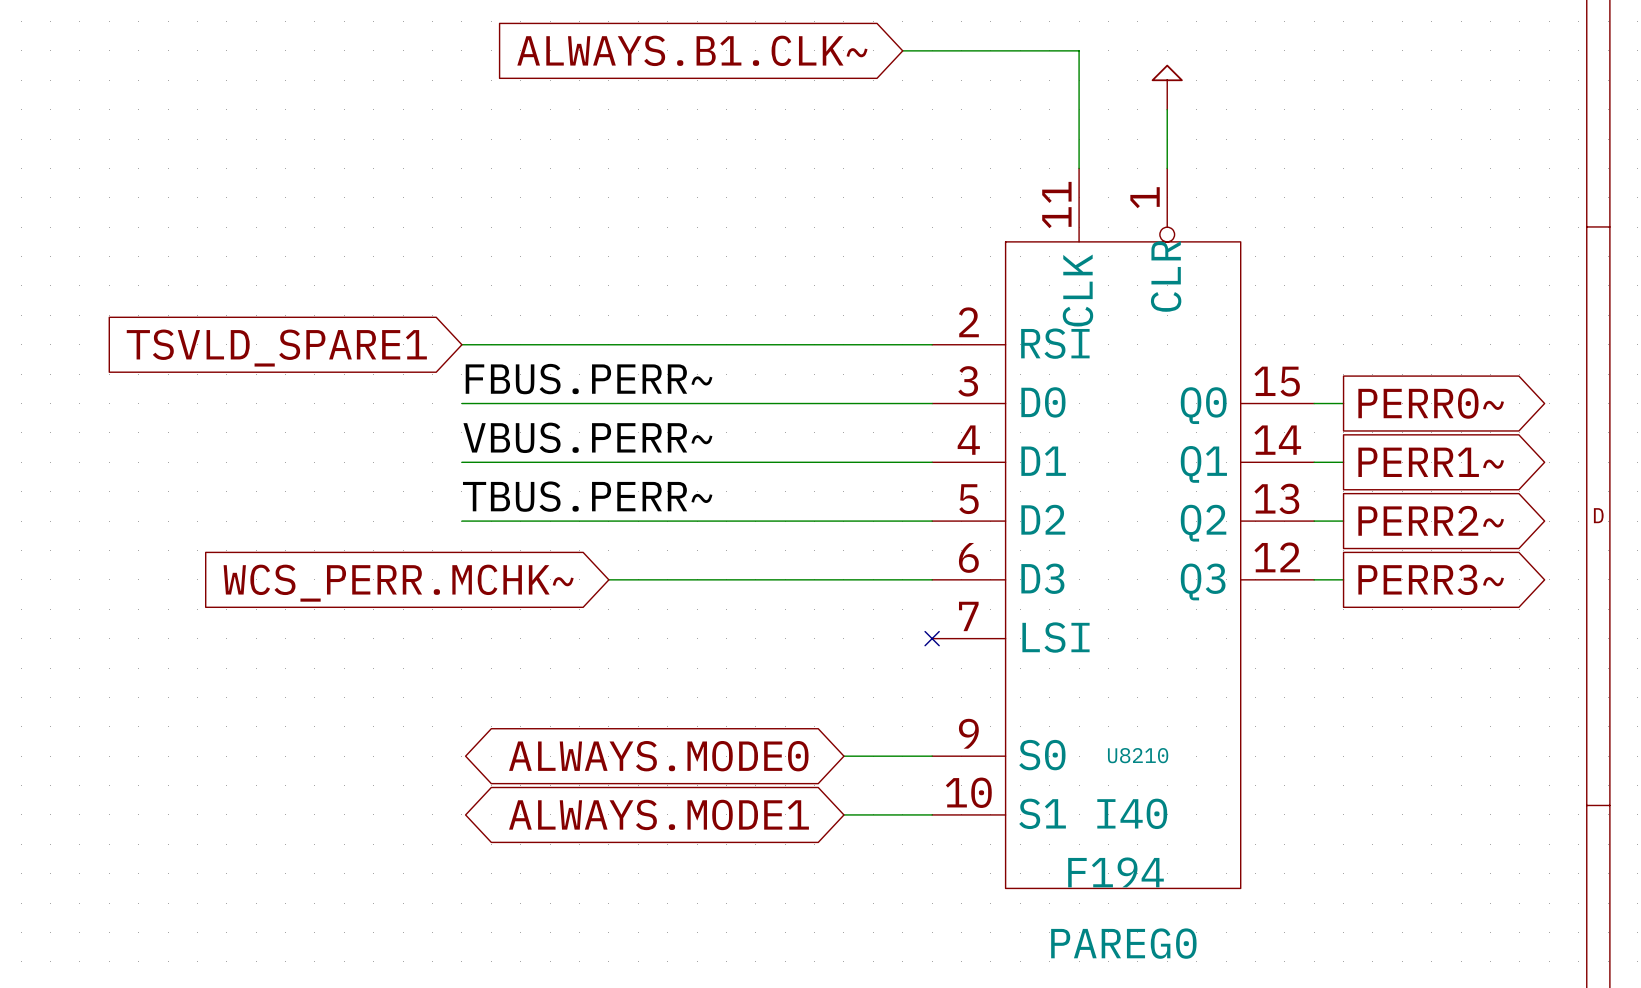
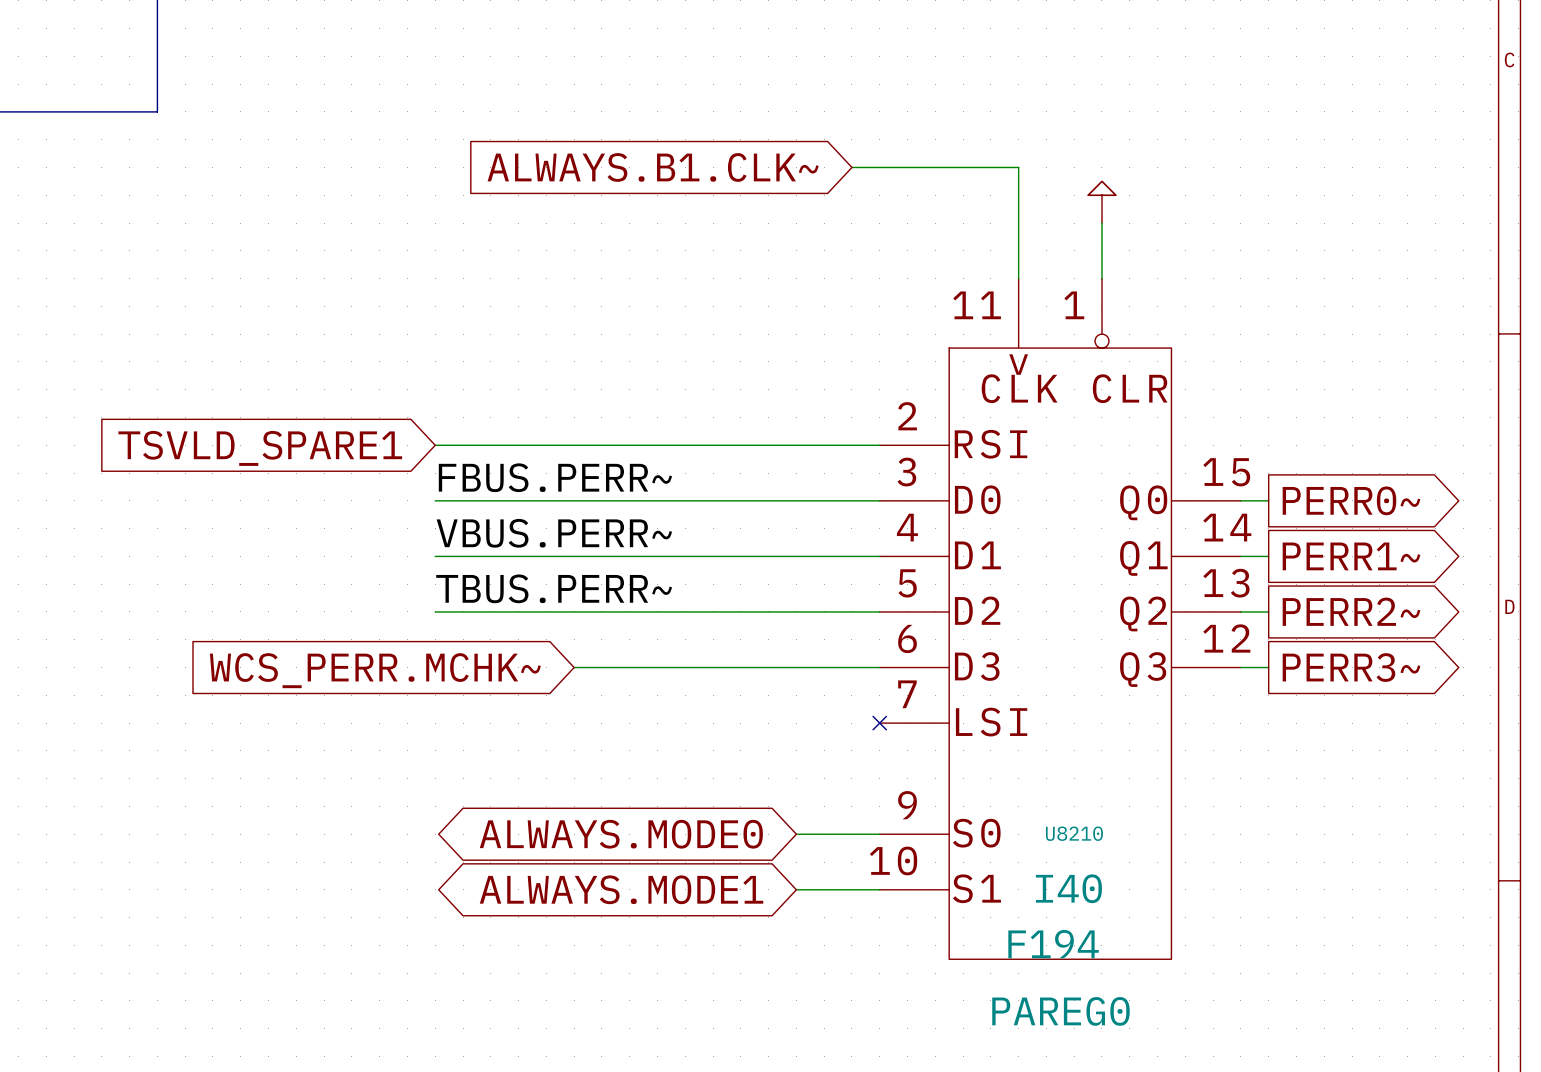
U8210 symbol: [932, 168, 1315, 889] -> [879, 278, 1241, 960]

